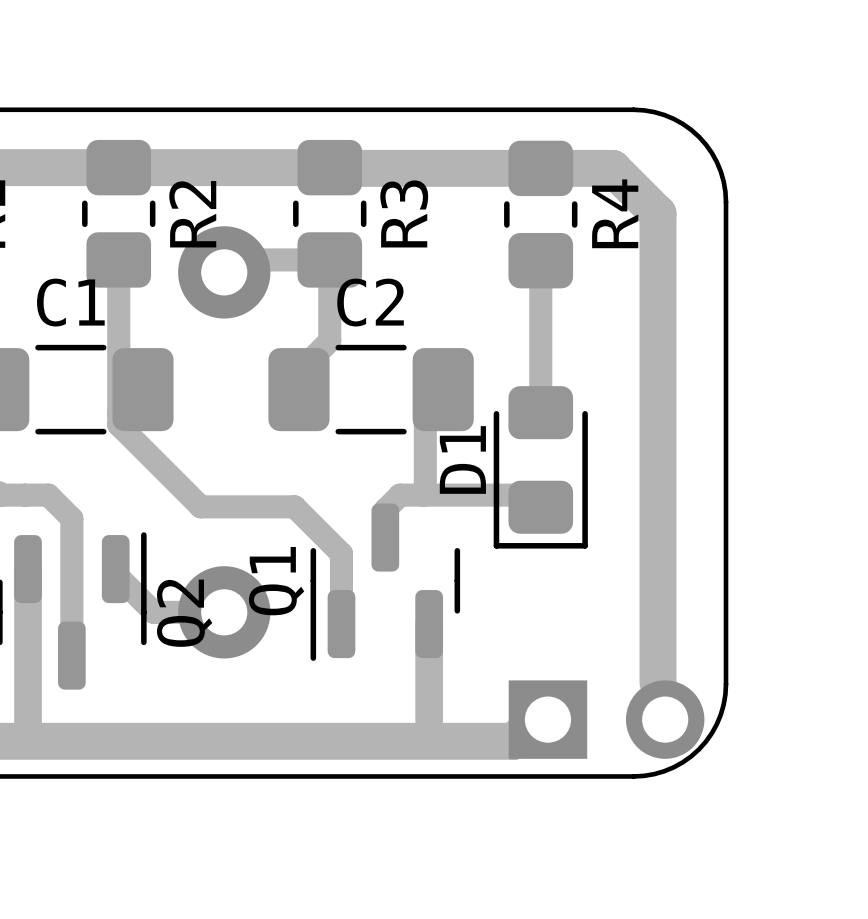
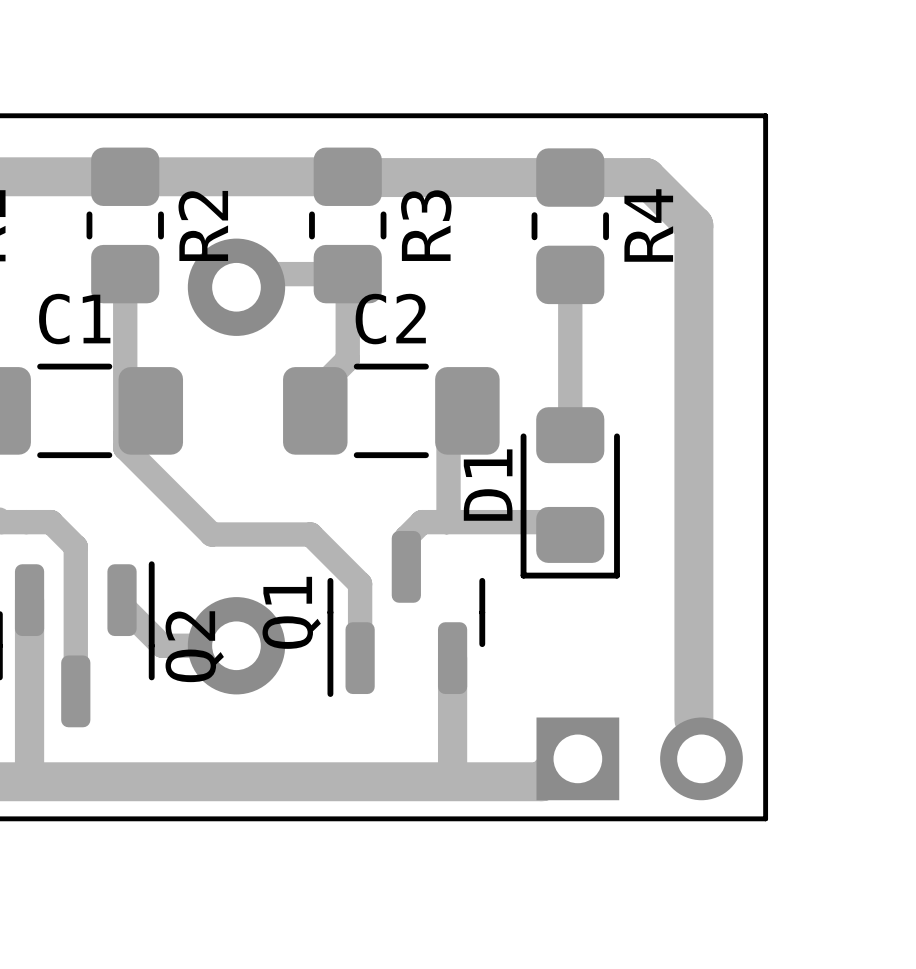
board edge: (633, 109) (654, 112) (673, 118) (698, 136) (716, 162) (723, 181) (726, 202) -> (668, 115) (765, 115) (765, 213)
board edge: (726, 684) (720, 714) (711, 733) (698, 749) (682, 762) (664, 771) (633, 776) -> (765, 721) (765, 818) (668, 818)

